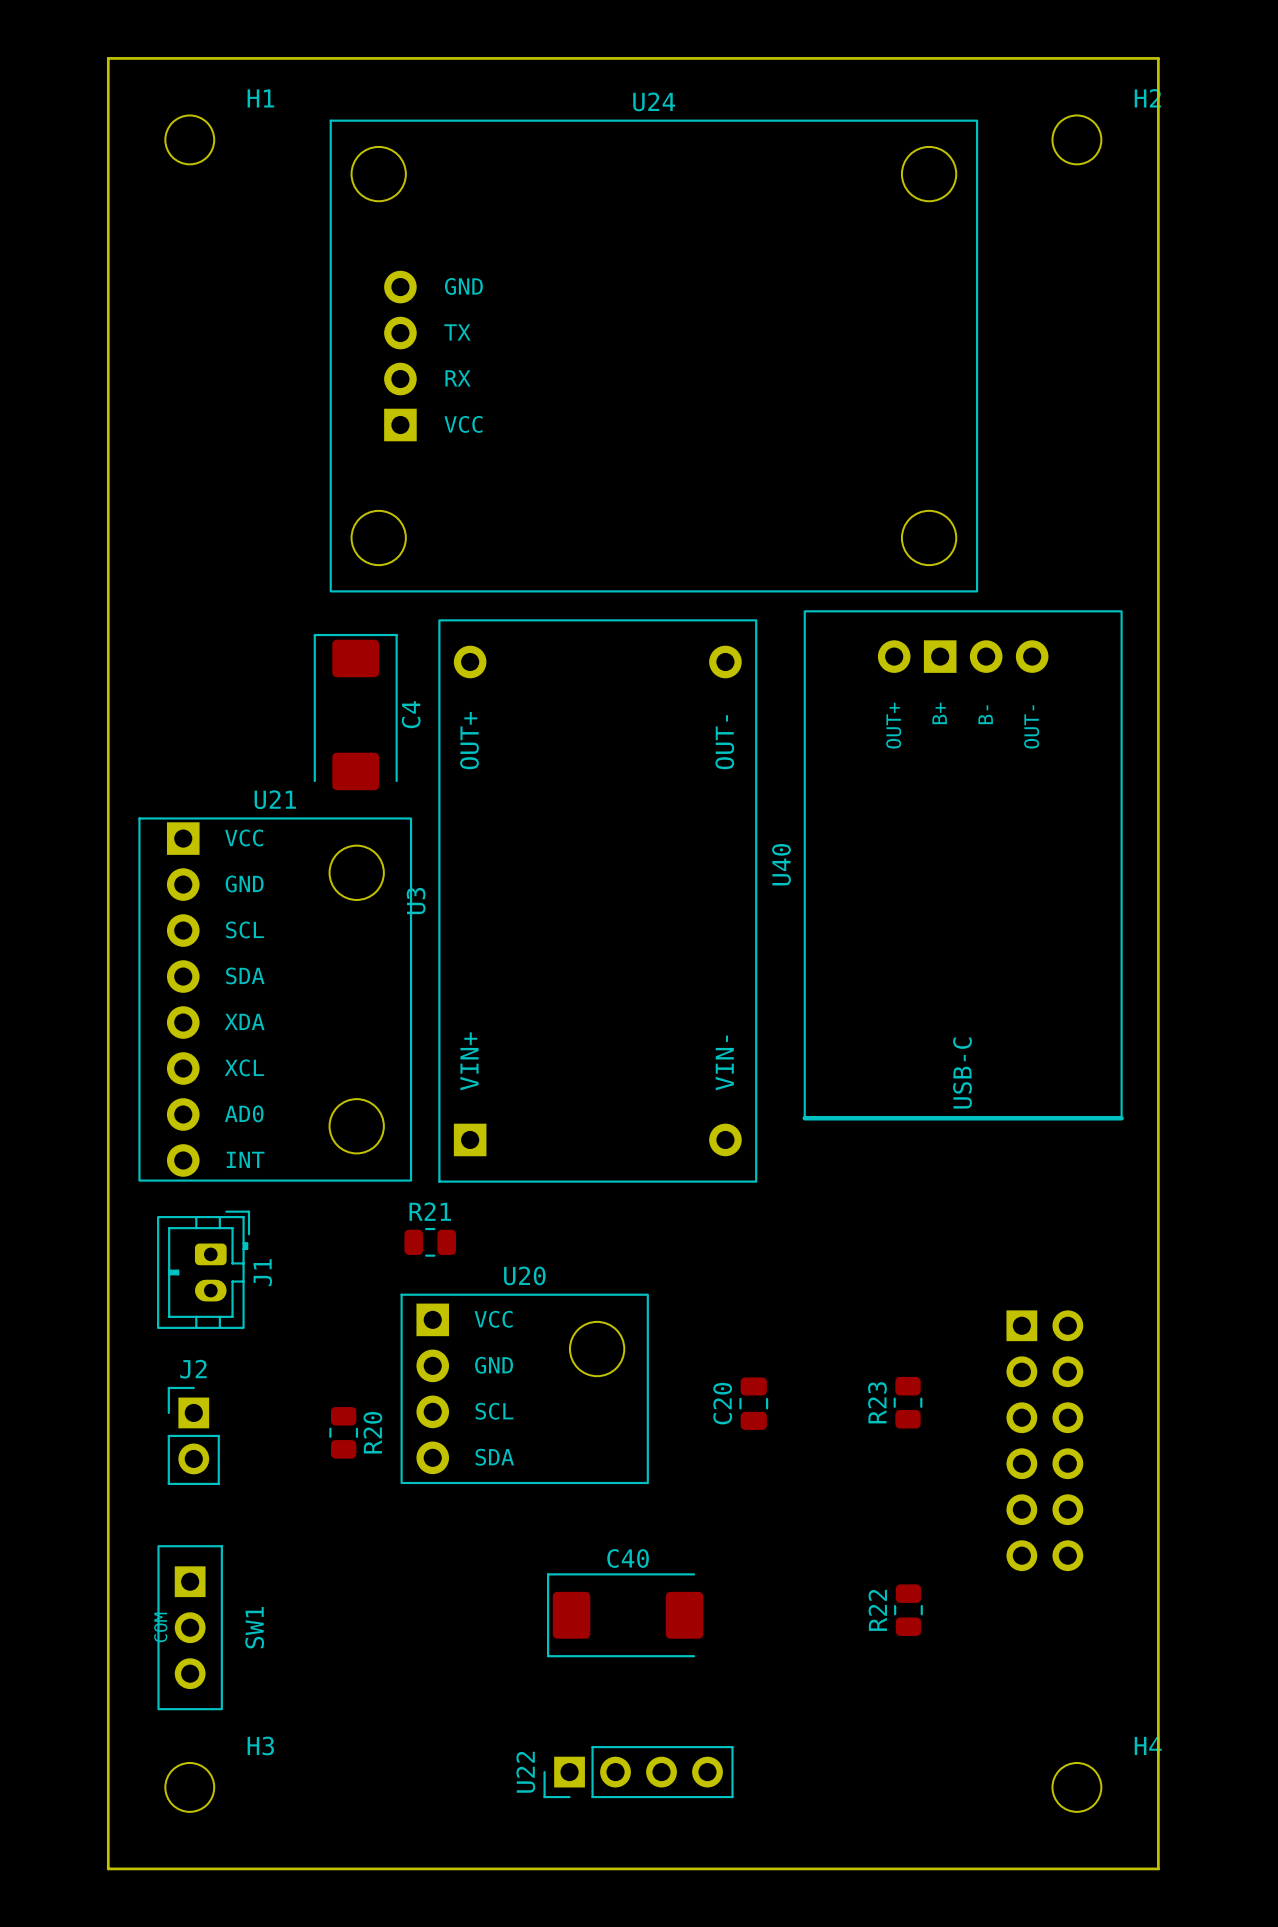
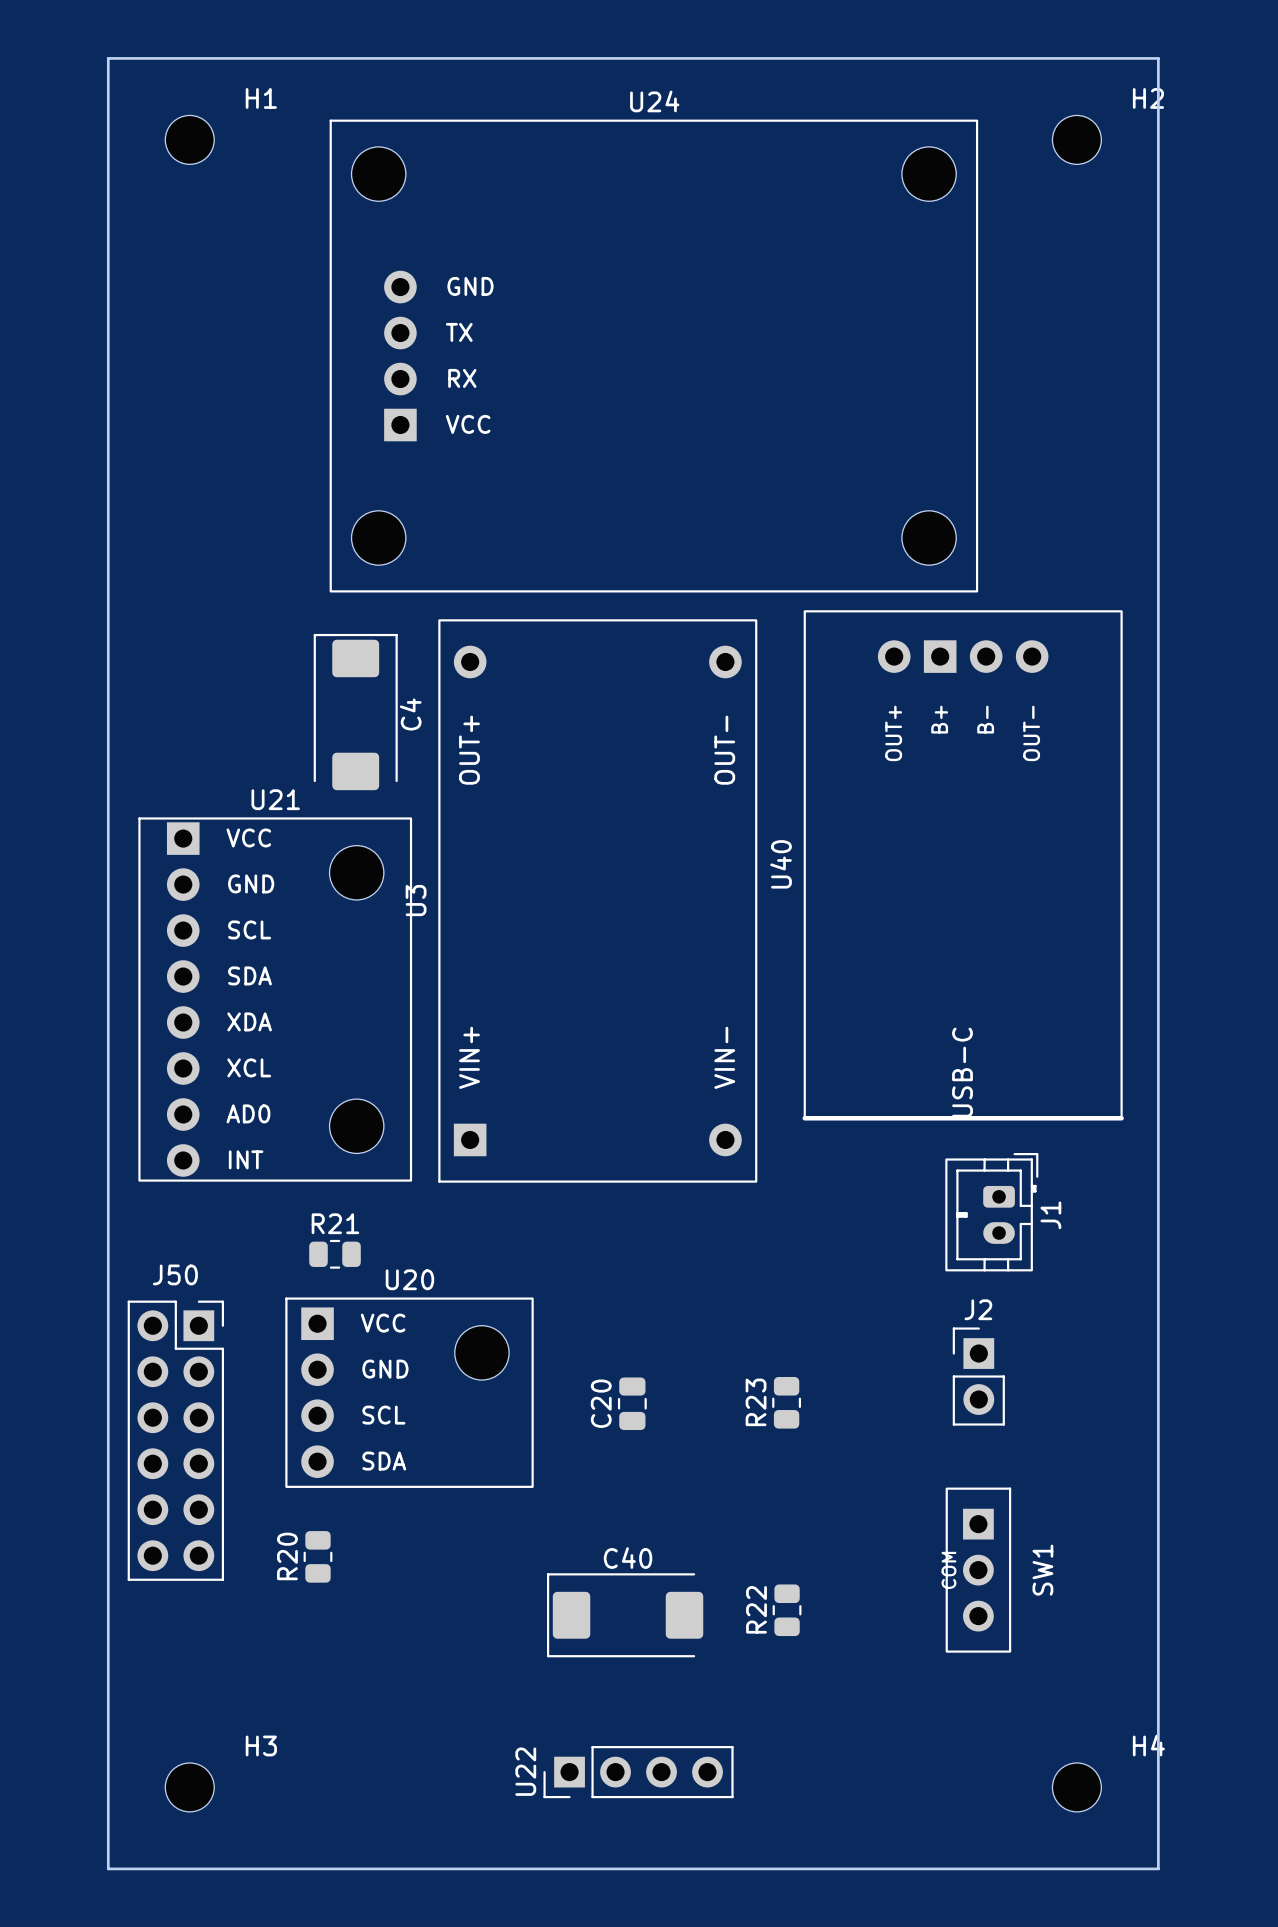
R21 position: (430, 1242) -> (335, 1254)
J1 position: (203, 1269) -> (991, 1212)
U20 position: (524, 1388) -> (409, 1392)
R23 position: (908, 1402) -> (786, 1402)
C20 position: (753, 1403) -> (632, 1403)
R20 position: (343, 1432) -> (318, 1556)
R20 name position: R20 (372, 1432) -> R20 (287, 1556)
J2 position: (193, 1435) -> (978, 1376)
J50: none -> (175, 1440)
part: (1044, 1440) -> none
R22 position: (908, 1610) -> (787, 1610)
SW1 position: (190, 1627) -> (978, 1570)

